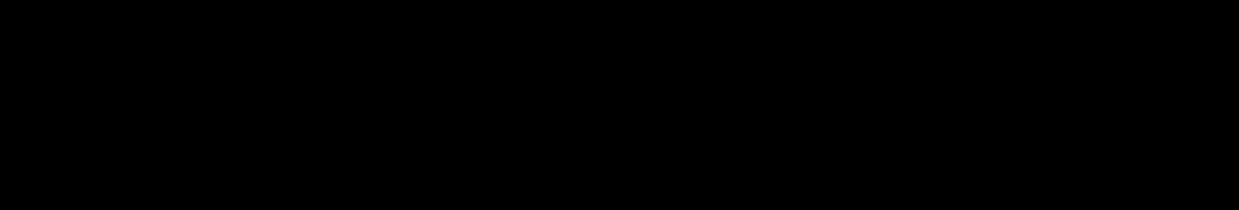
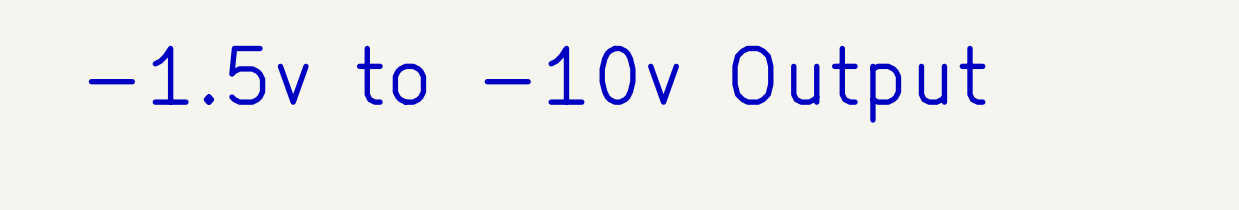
text: none -> -1.5v to -10v Output (537, 84)

